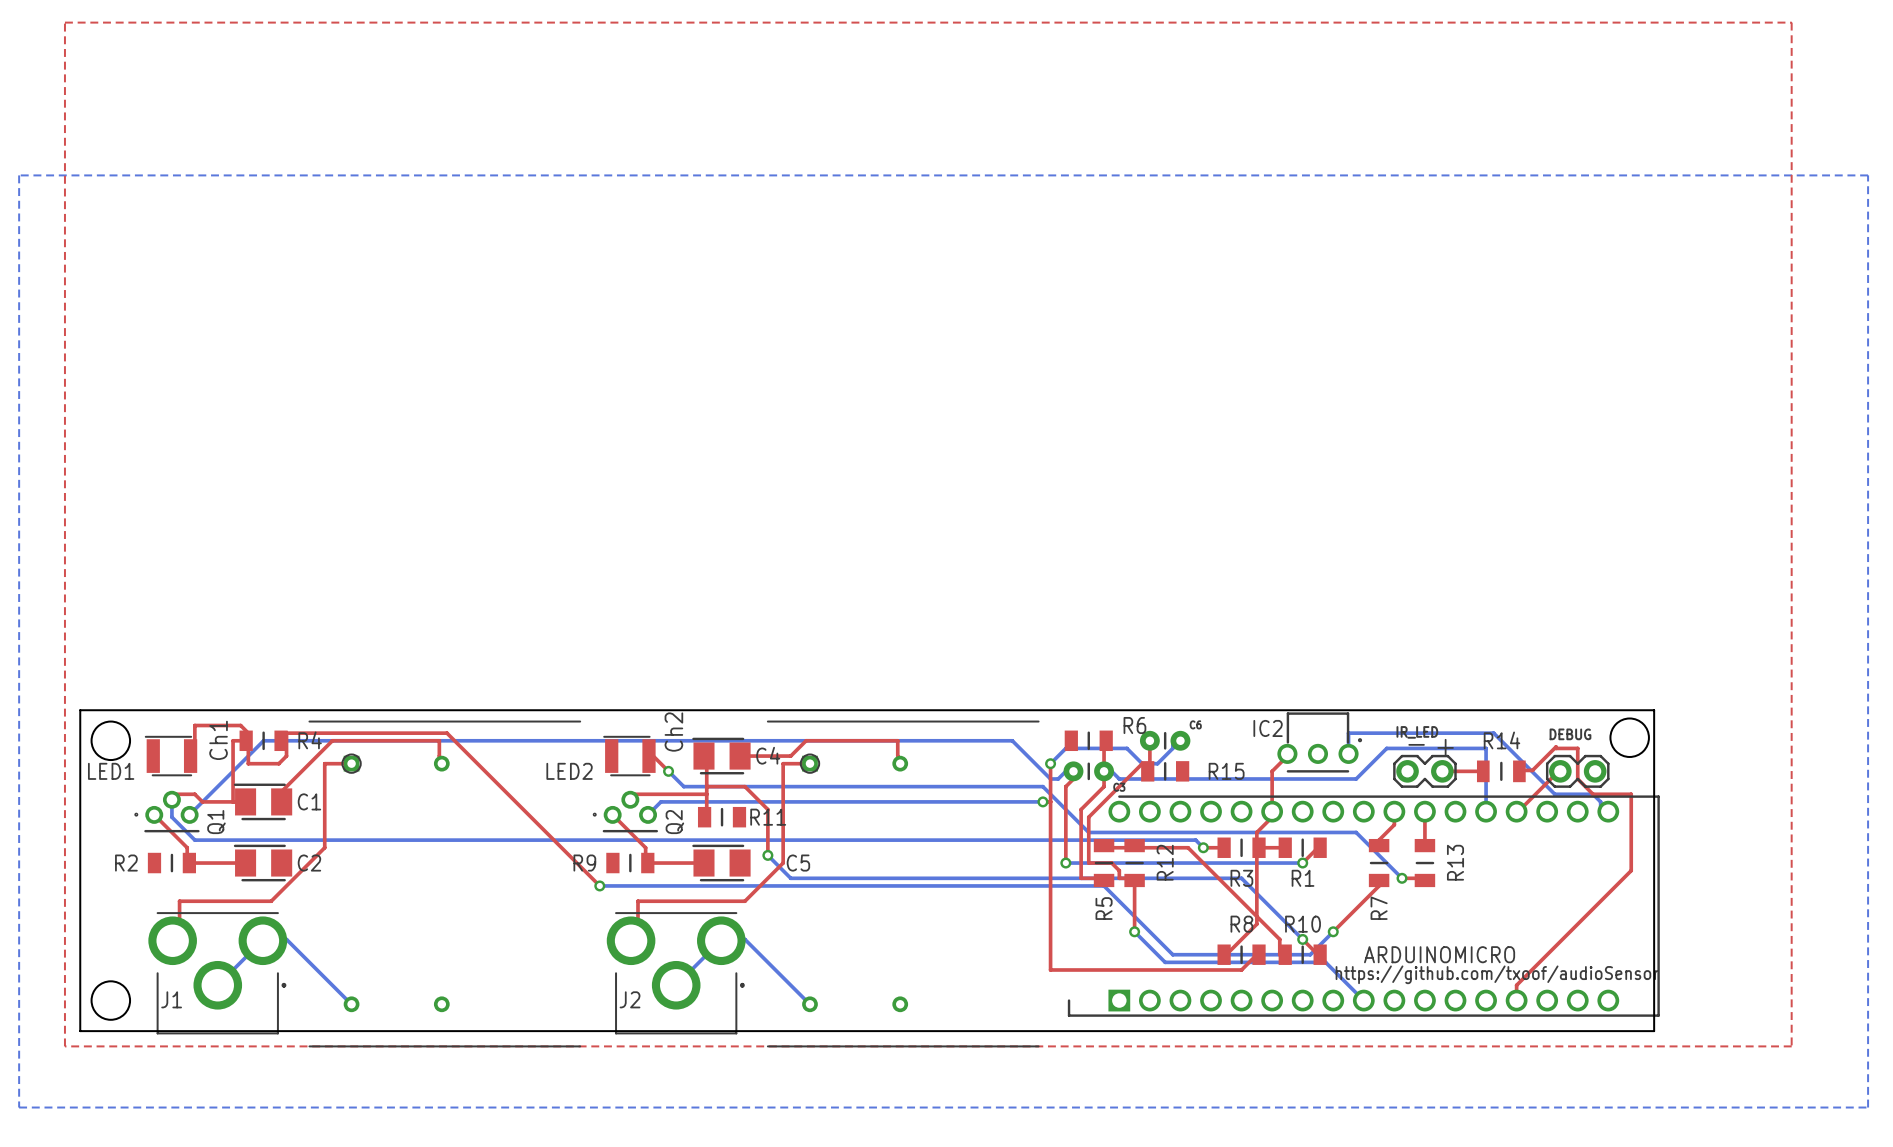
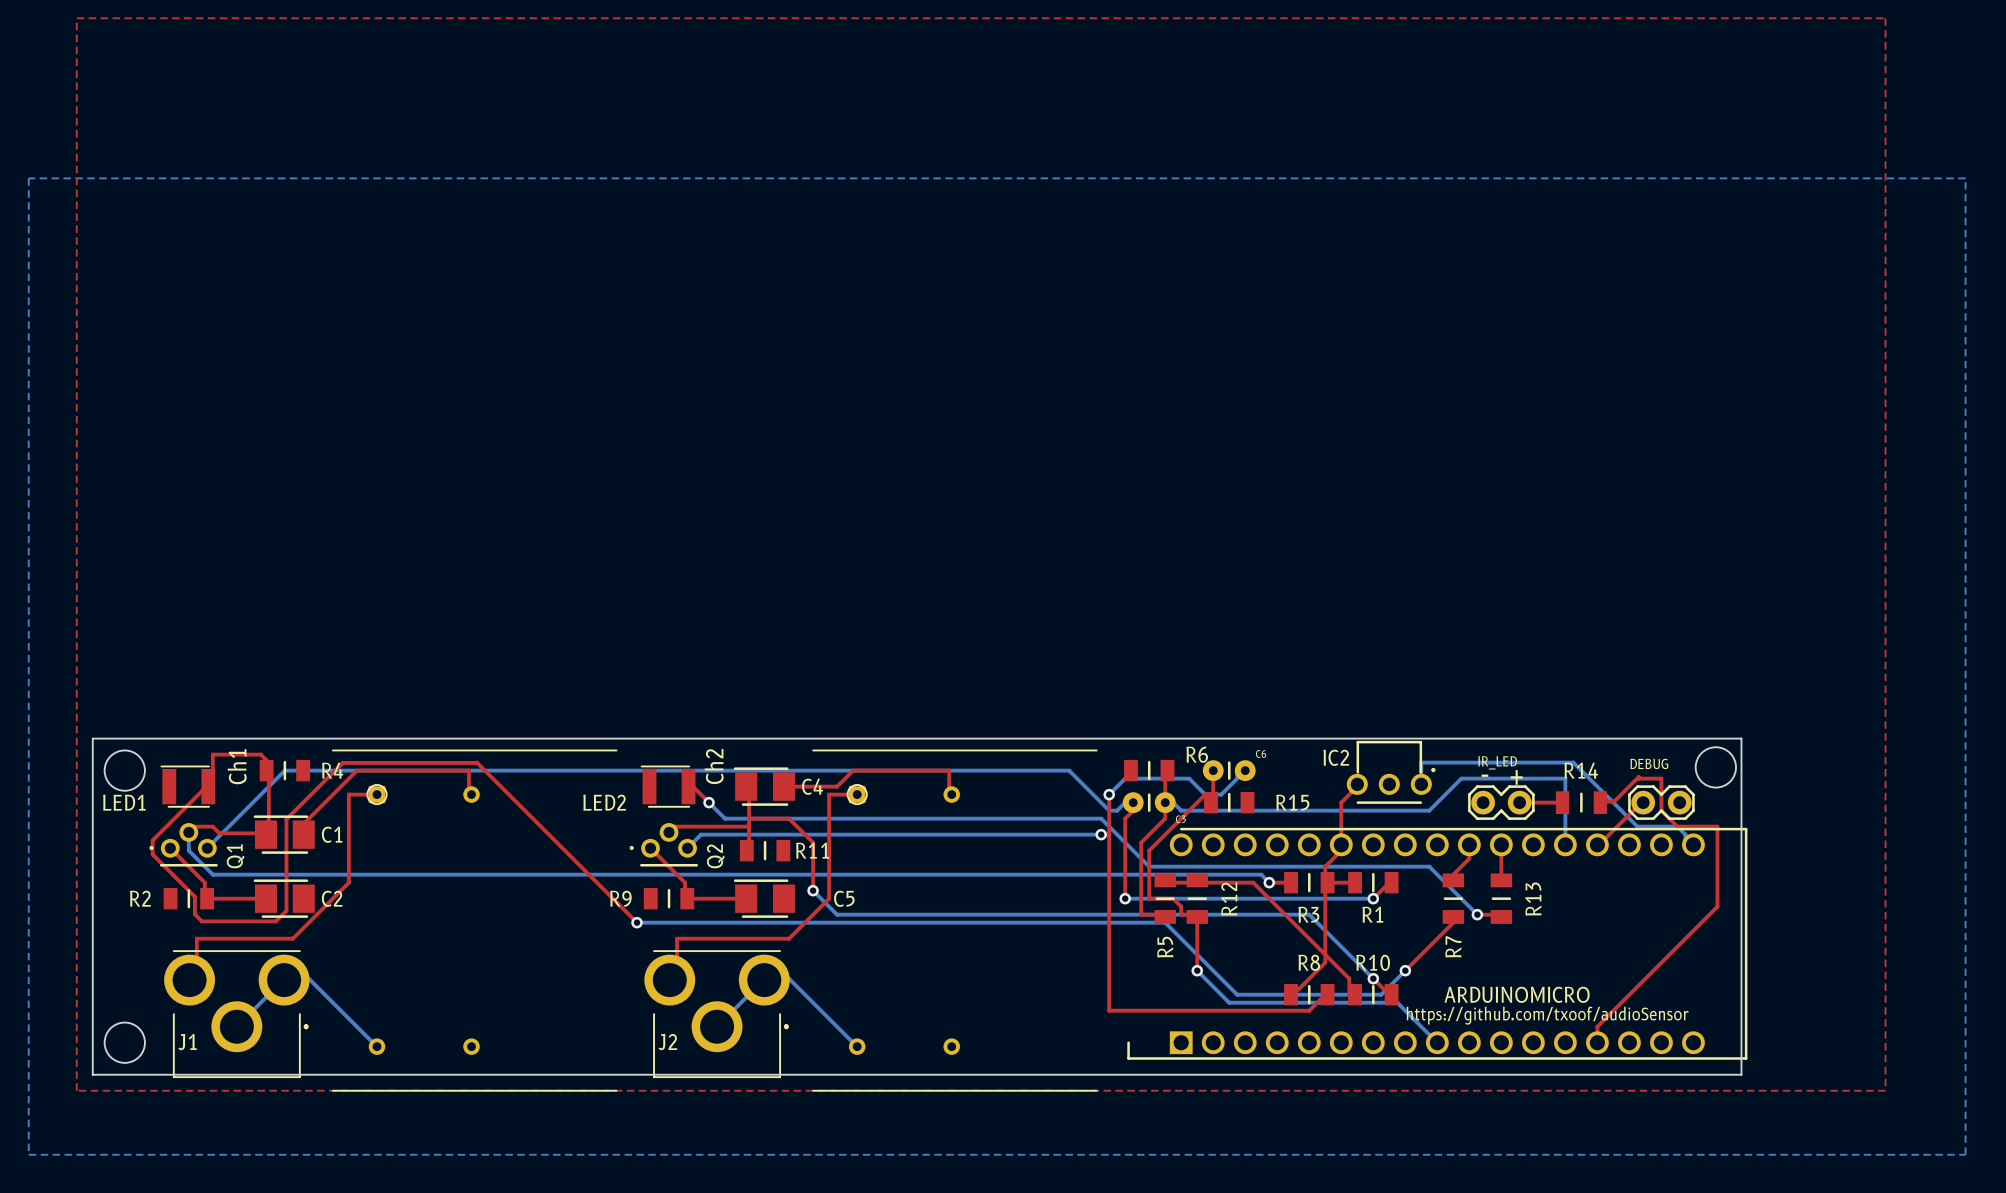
top track: (446, 733) (286, 733) (286, 756) (278, 763) (248, 763) -> (476, 762) (342, 762) (286, 819) (286, 910) (275, 921) (201, 921) (194, 914) (194, 896) (152, 854) (152, 840) (208, 786)
top track: (246, 740) (233, 740) (233, 801) -> none
top track: (201, 800) (245, 801) -> (219, 833) (268, 833) (268, 794)

